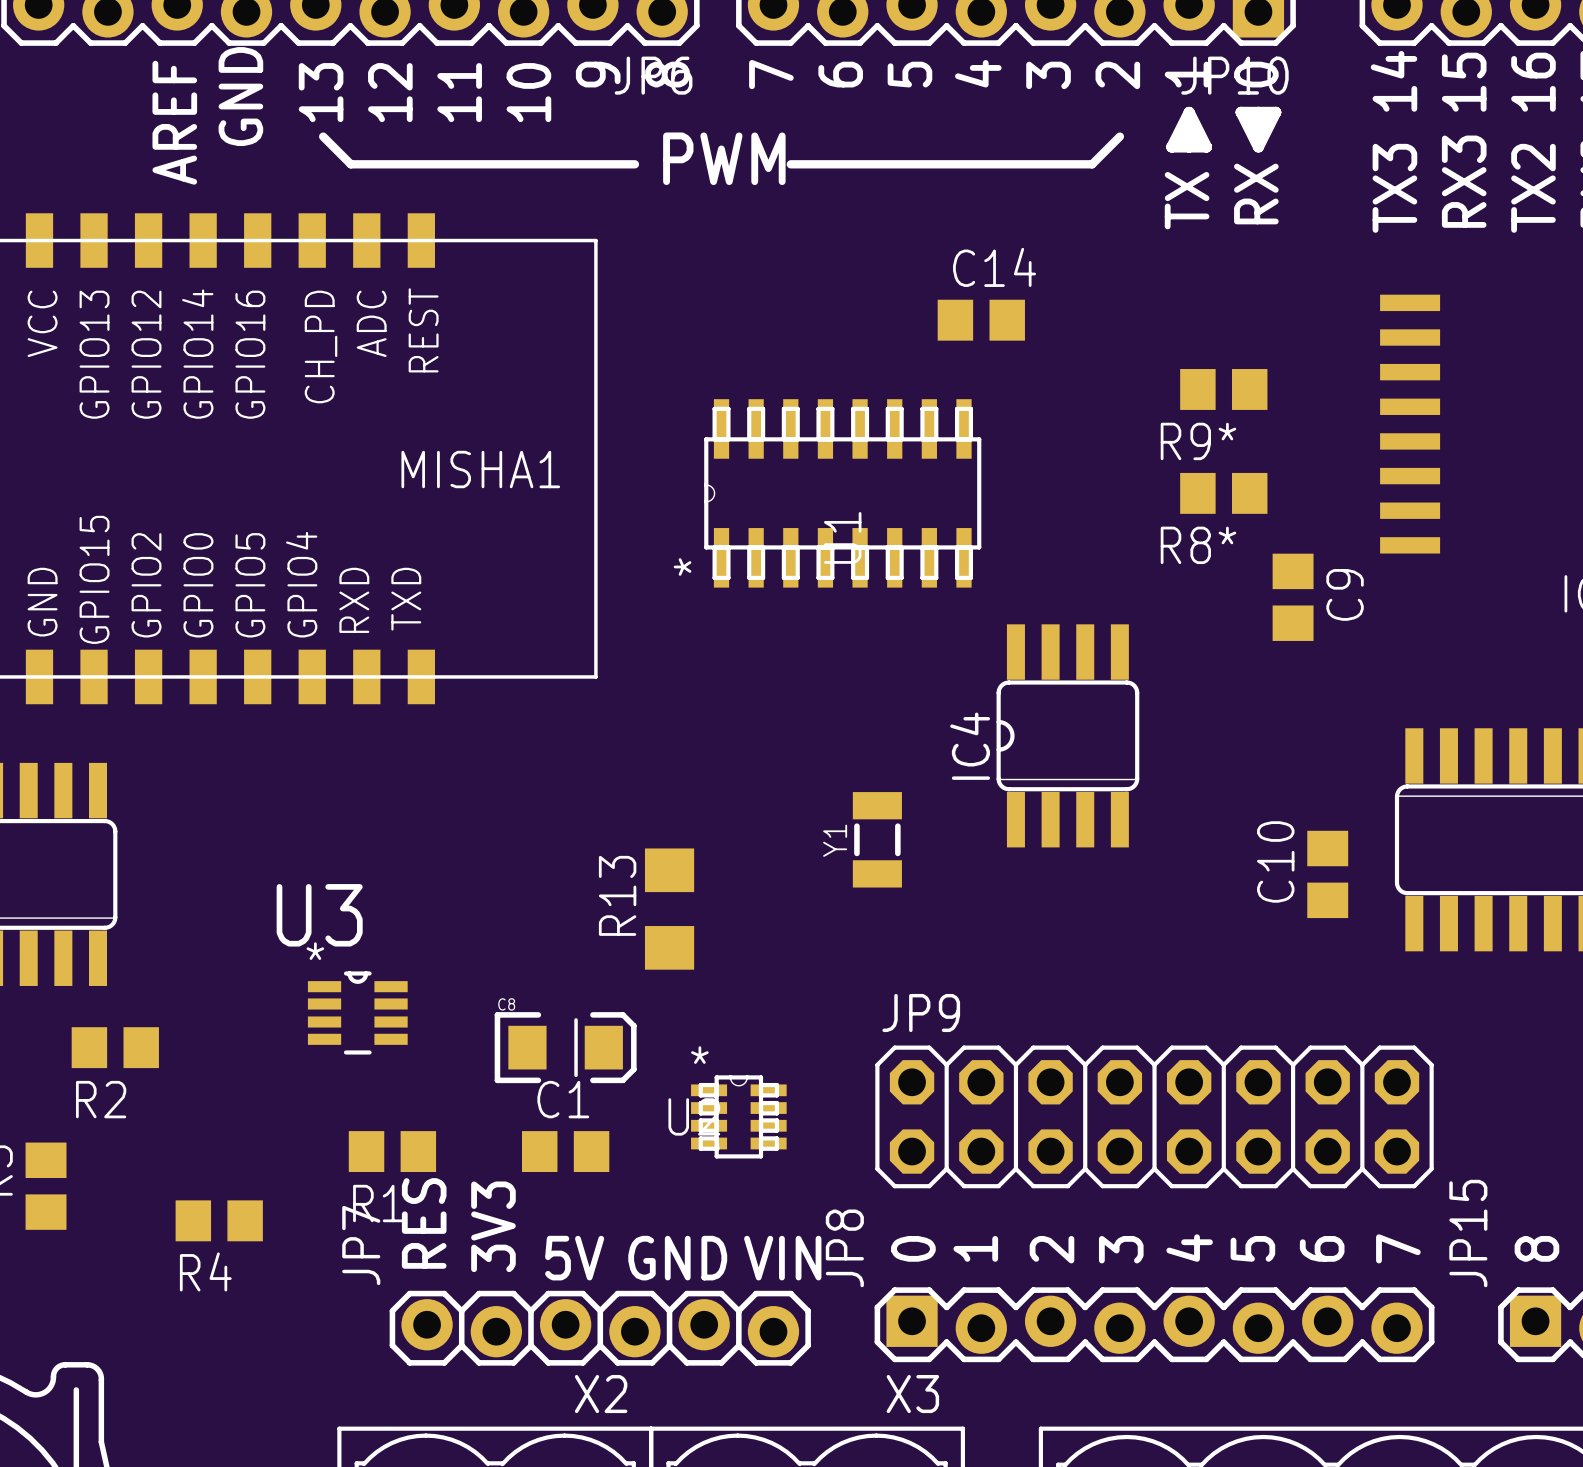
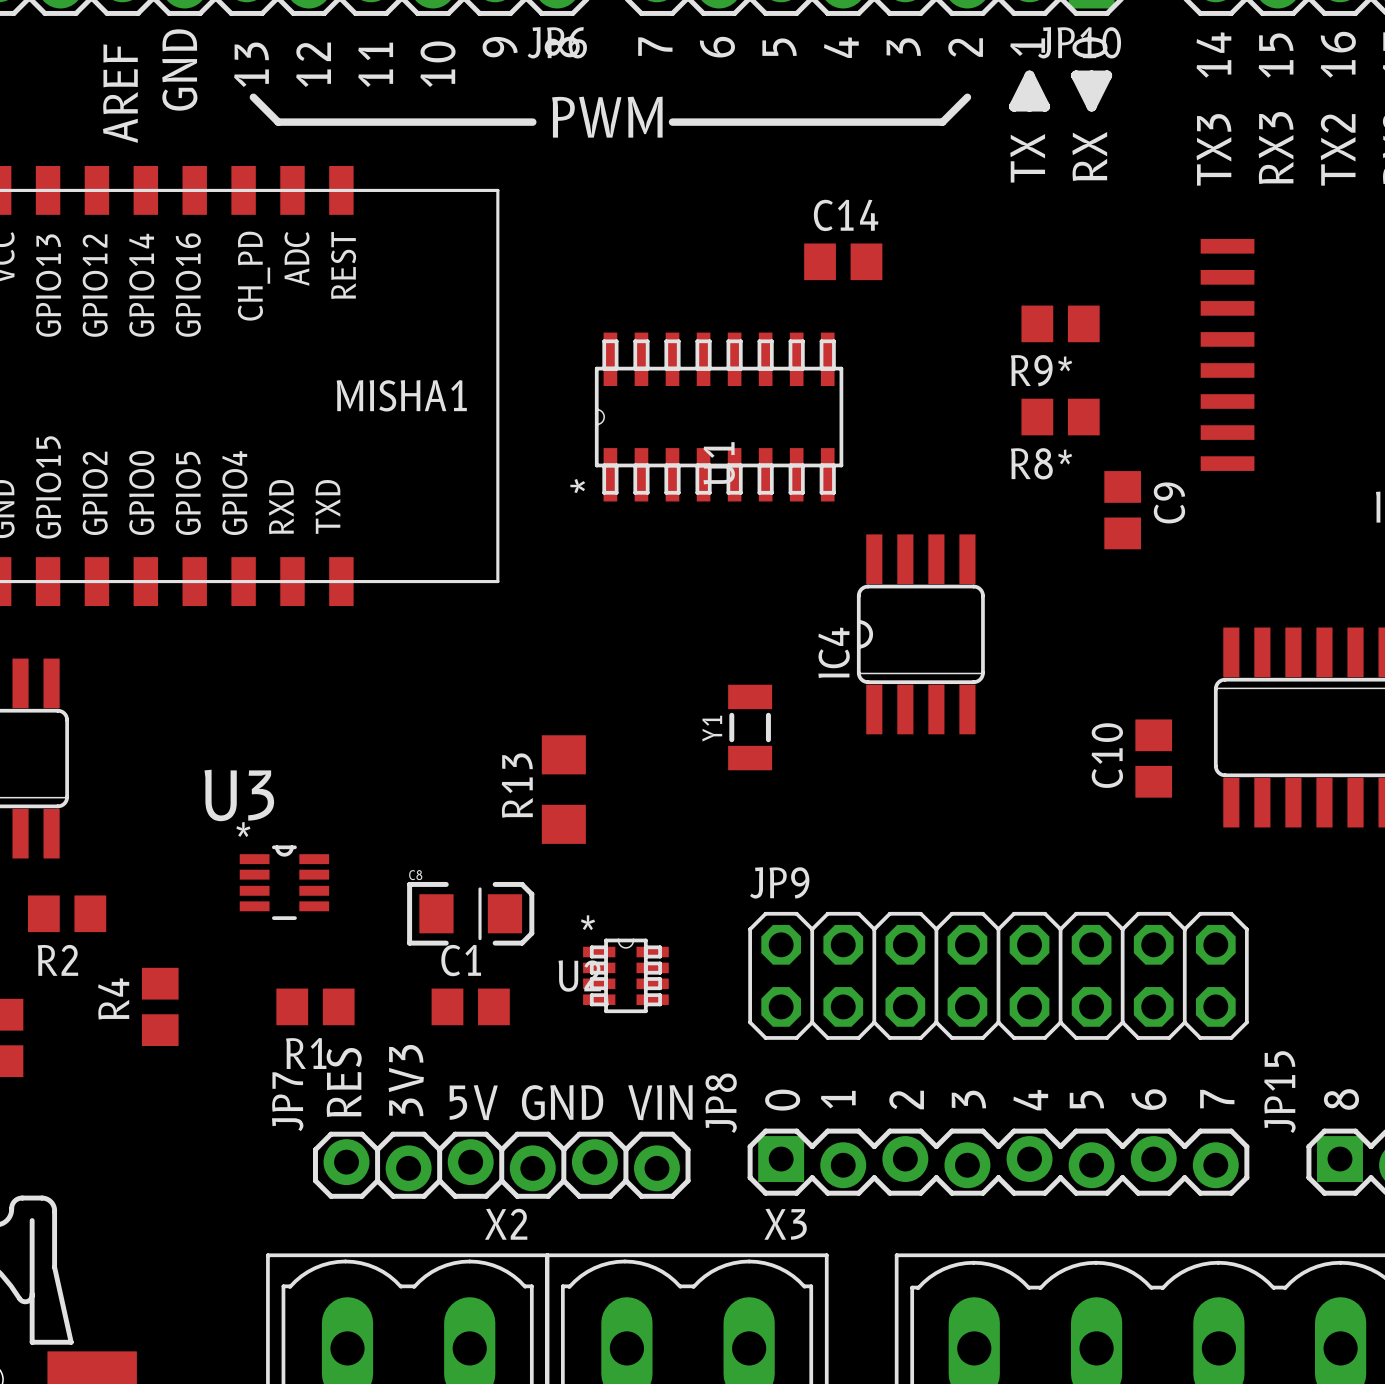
R4 rotation: 0° (219, 1220) -> 90° clockwise (160, 1006)
R4 position: (219, 1220) -> (160, 1006)

